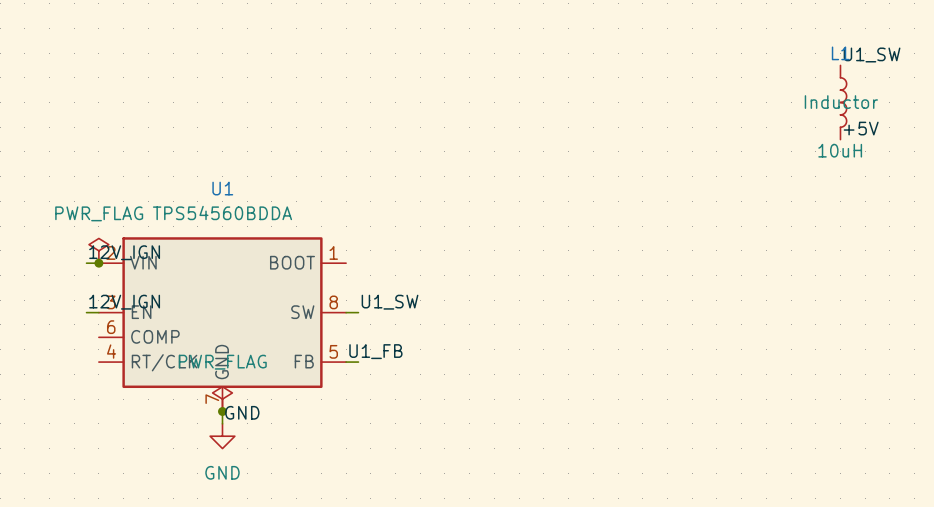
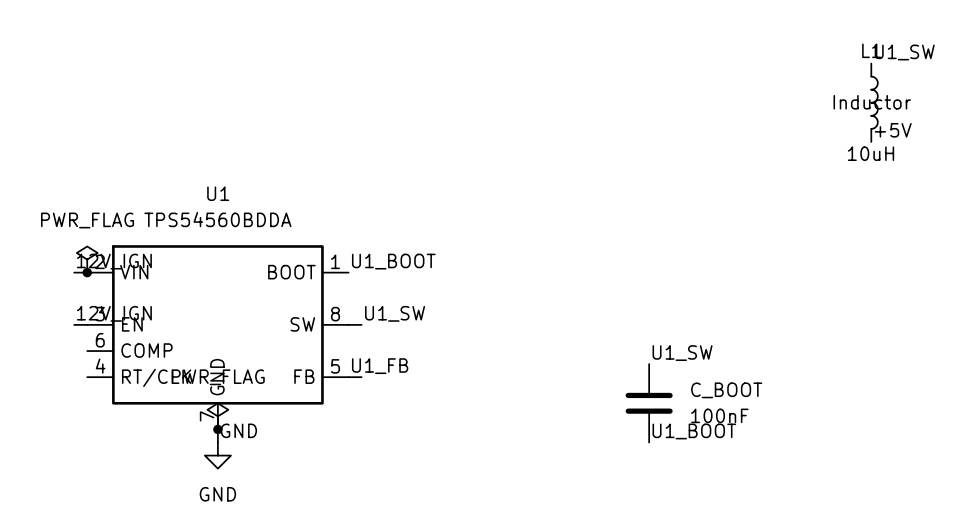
label: none -> U1_BOOT (393, 261)
label: none -> U1_SW (682, 353)
C_BOOT: none -> 100nF (649, 403)
label: none -> U1_BOOT (694, 431)

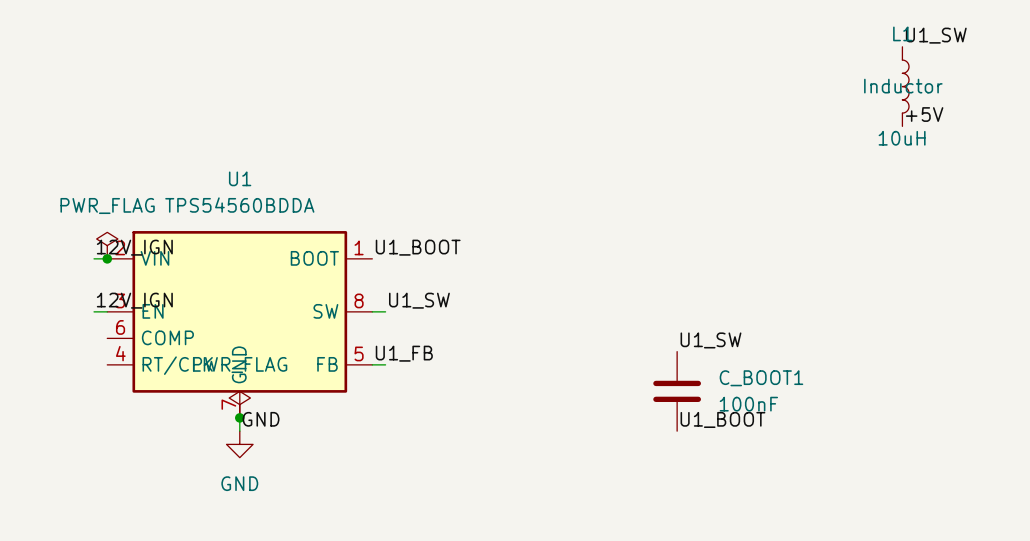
C_BOOT name: C_BOOT (726, 390) -> C_BOOT1 (761, 378)

